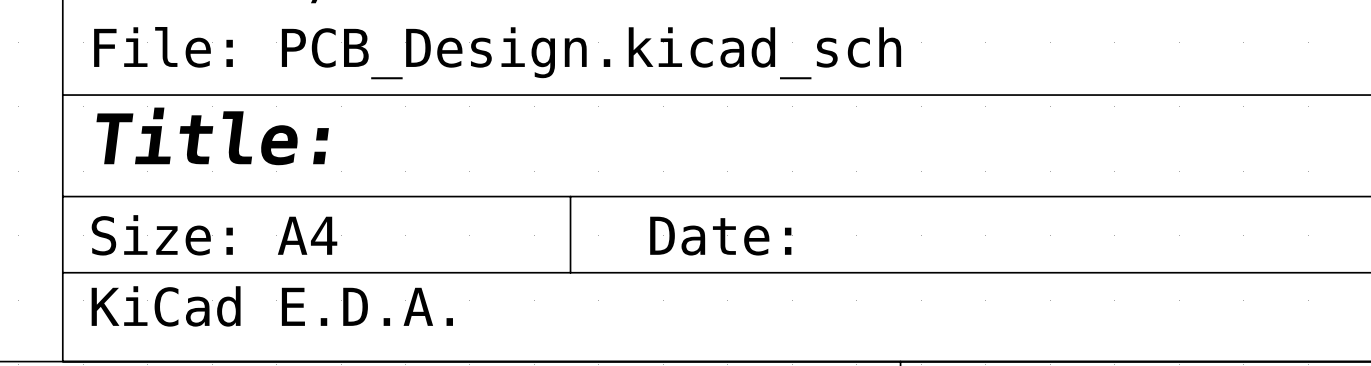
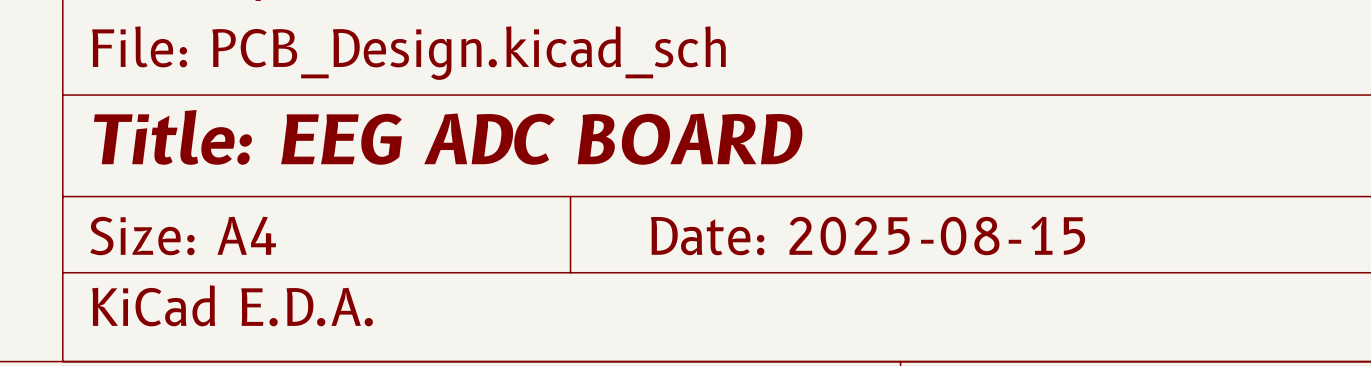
title block: Title: (212, 136) -> Title: EEG ADC BOARD (448, 137)
title block: Date: (720, 236) -> Date: 2025-08-15 (868, 235)

